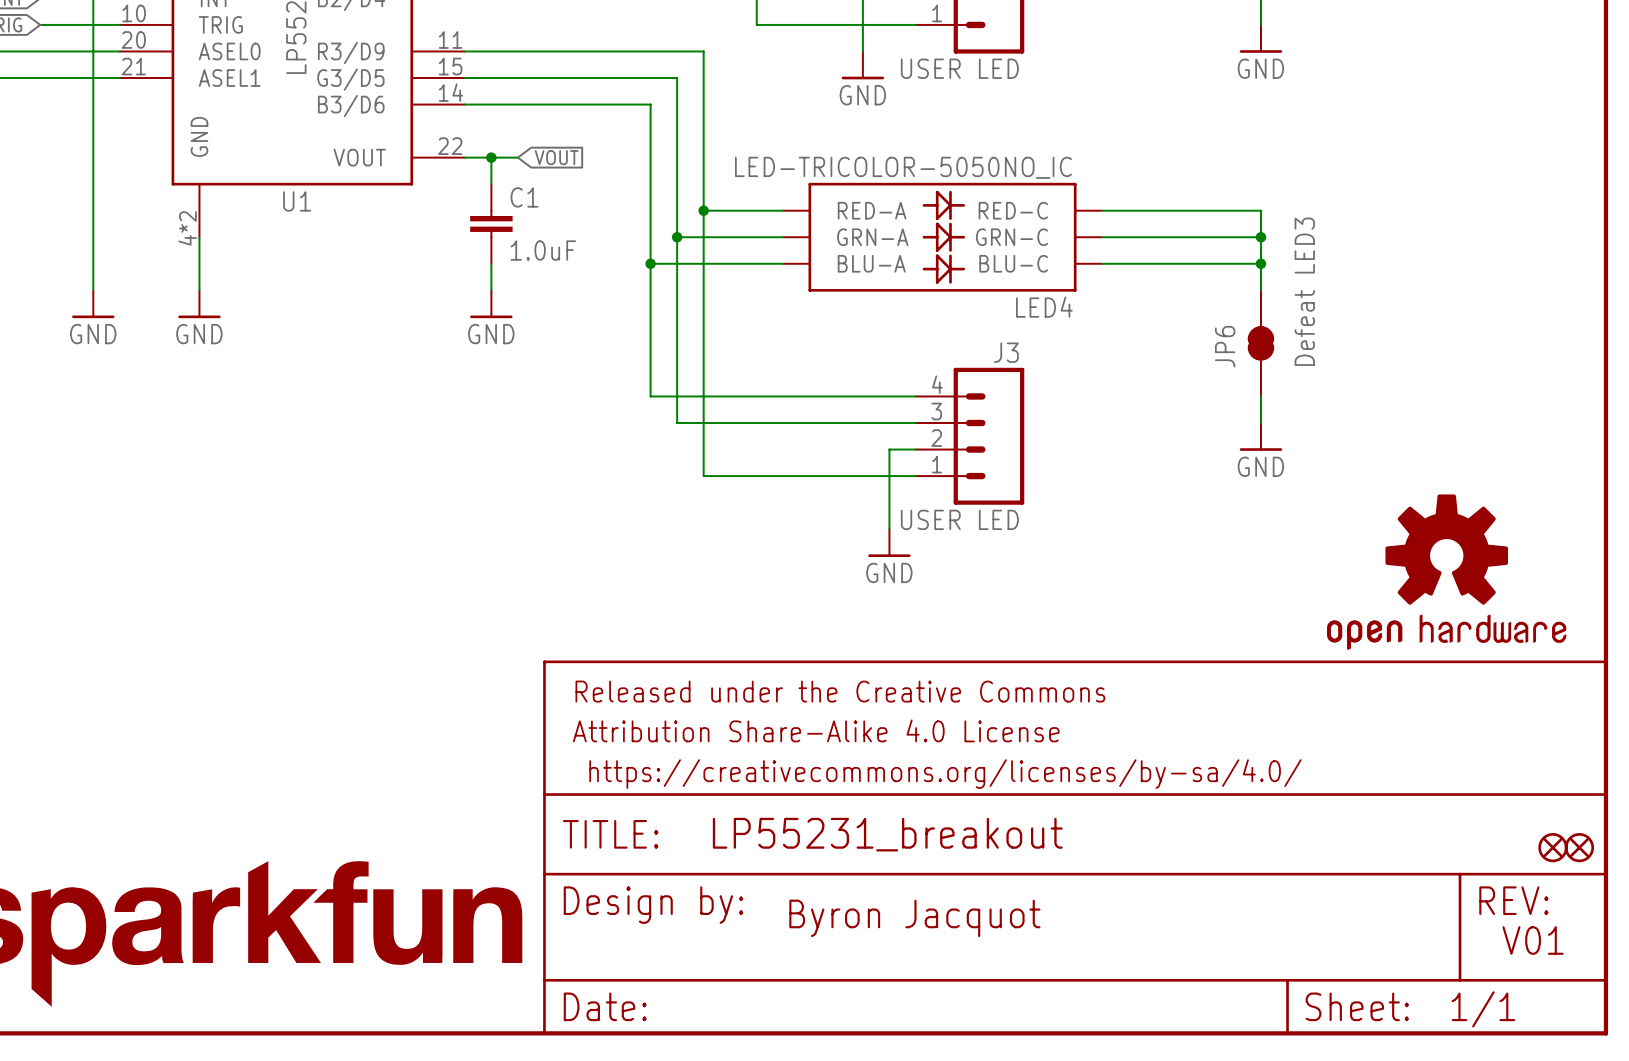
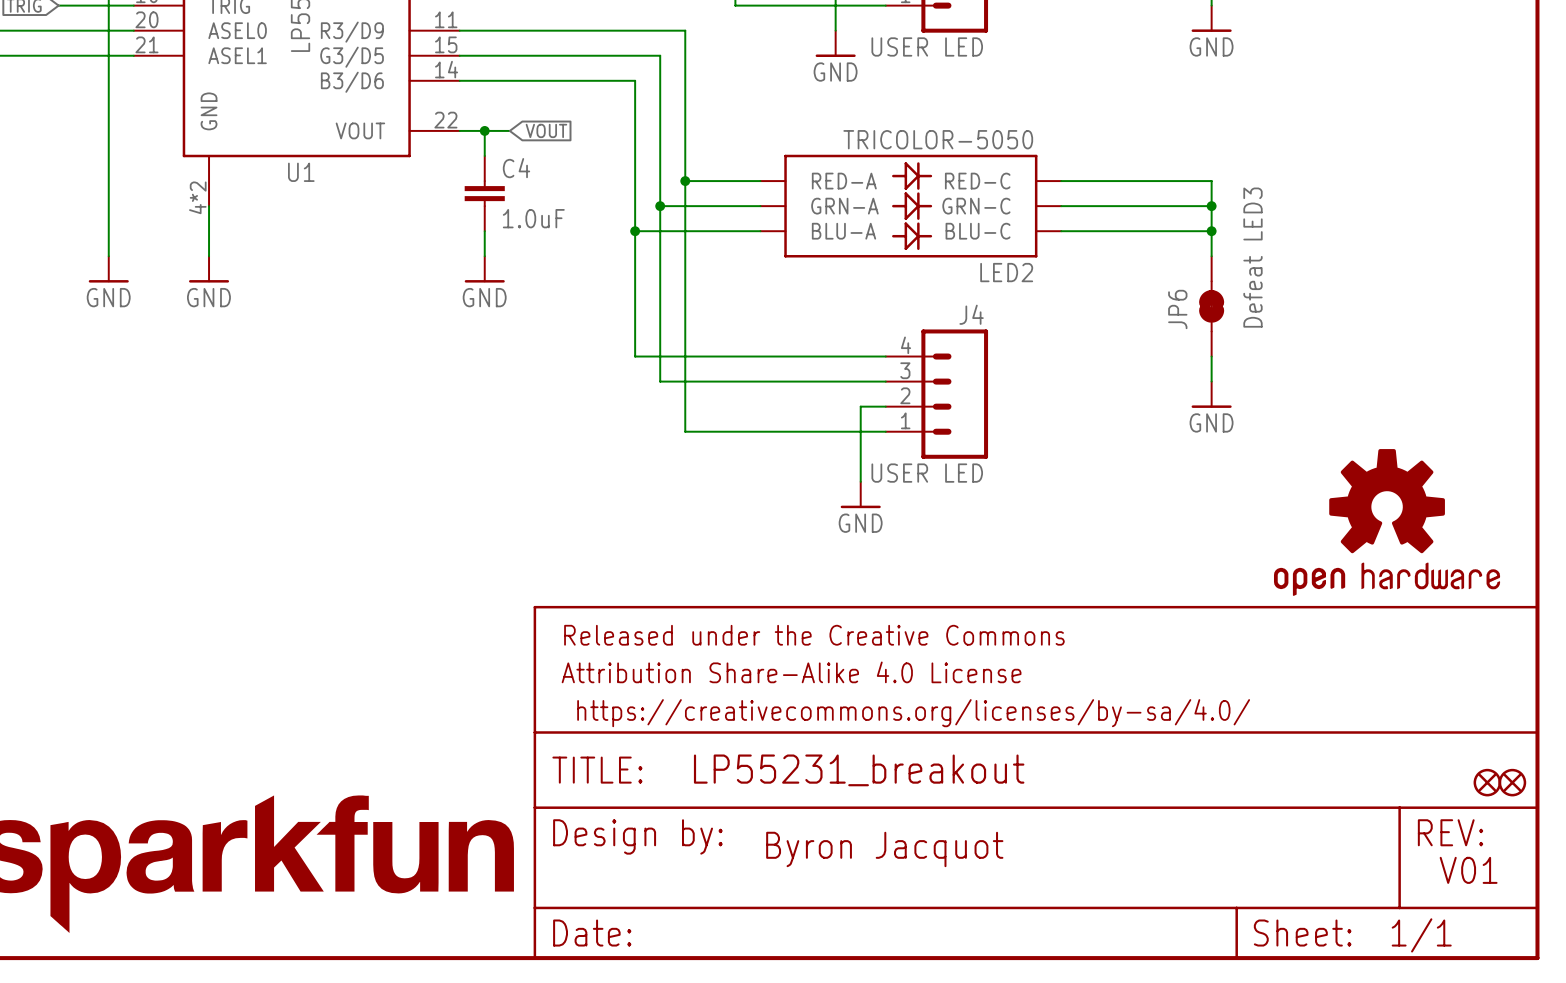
LED4 value: LED-TRICOLOR-5050NO_IC (903, 167) -> TRICOLOR-5050 (938, 139)
C1 name: C1 (524, 197) -> C4 (516, 168)
LED4 name: LED4 (1044, 307) -> LED2 (1006, 272)
J3 name: J3 (1006, 352) -> J4 (971, 314)

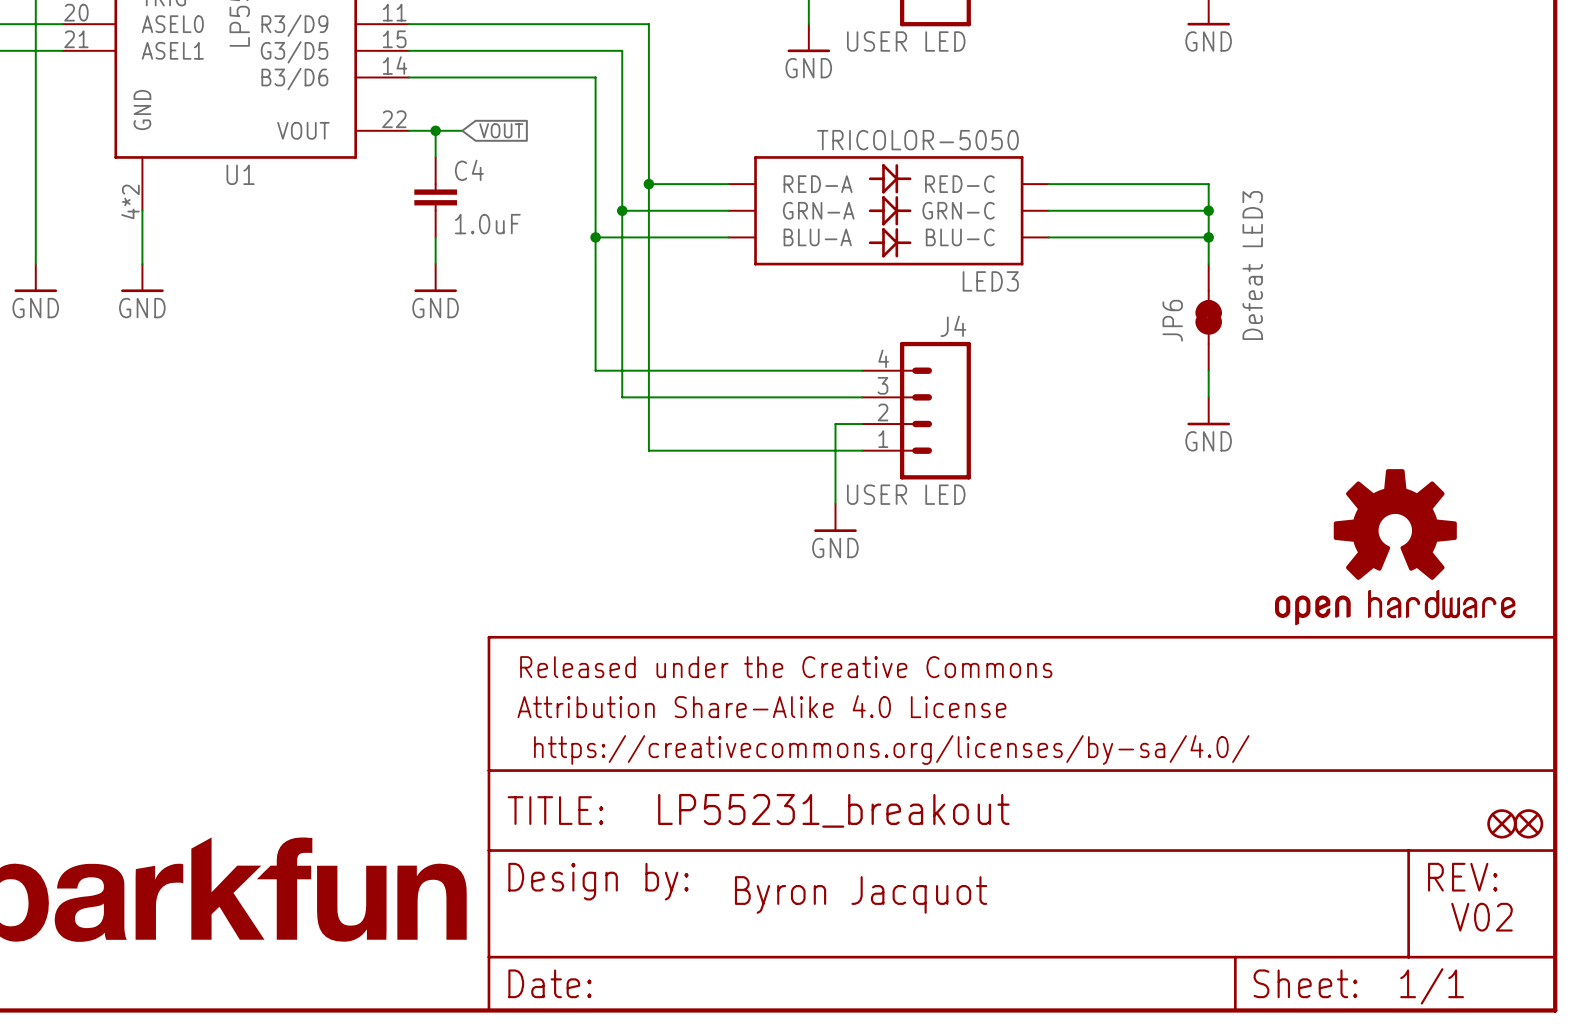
LED2 name: LED2 (1006, 272) -> LED3 (990, 281)
text: V01 (1468, 870) -> V02 (1481, 917)

